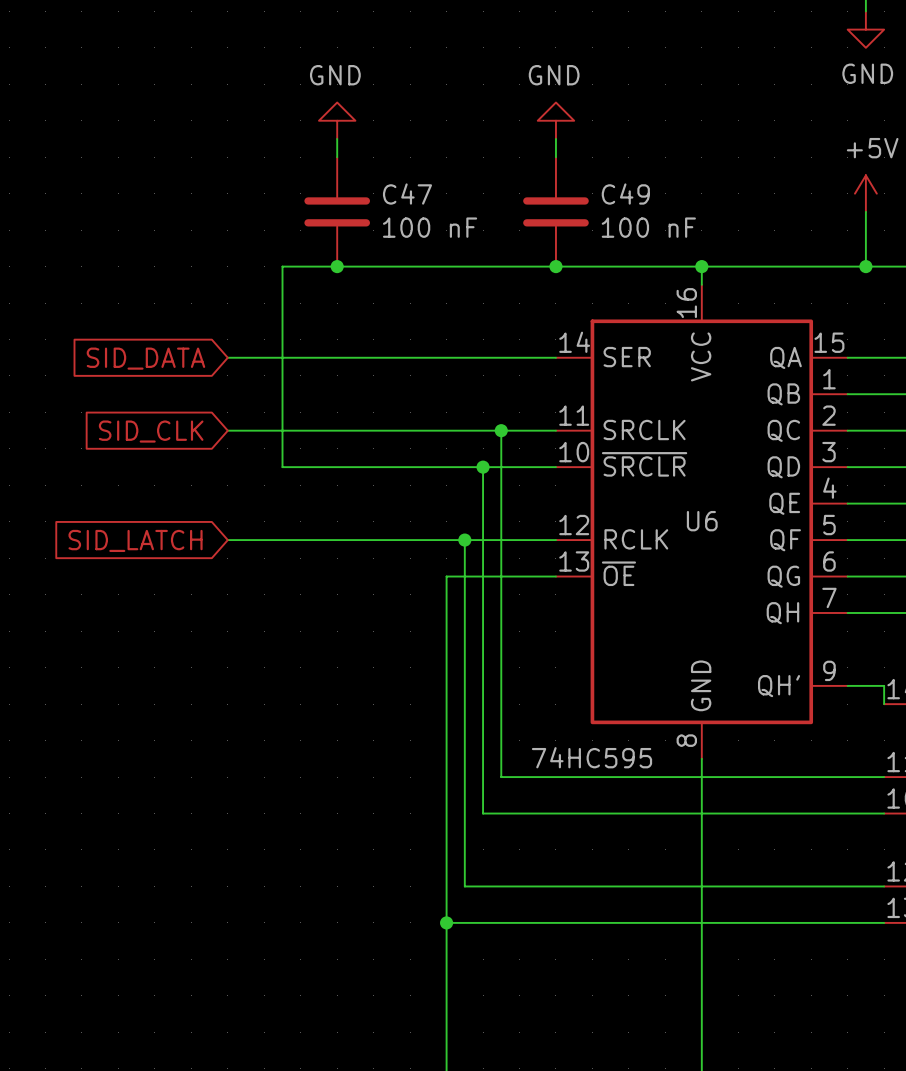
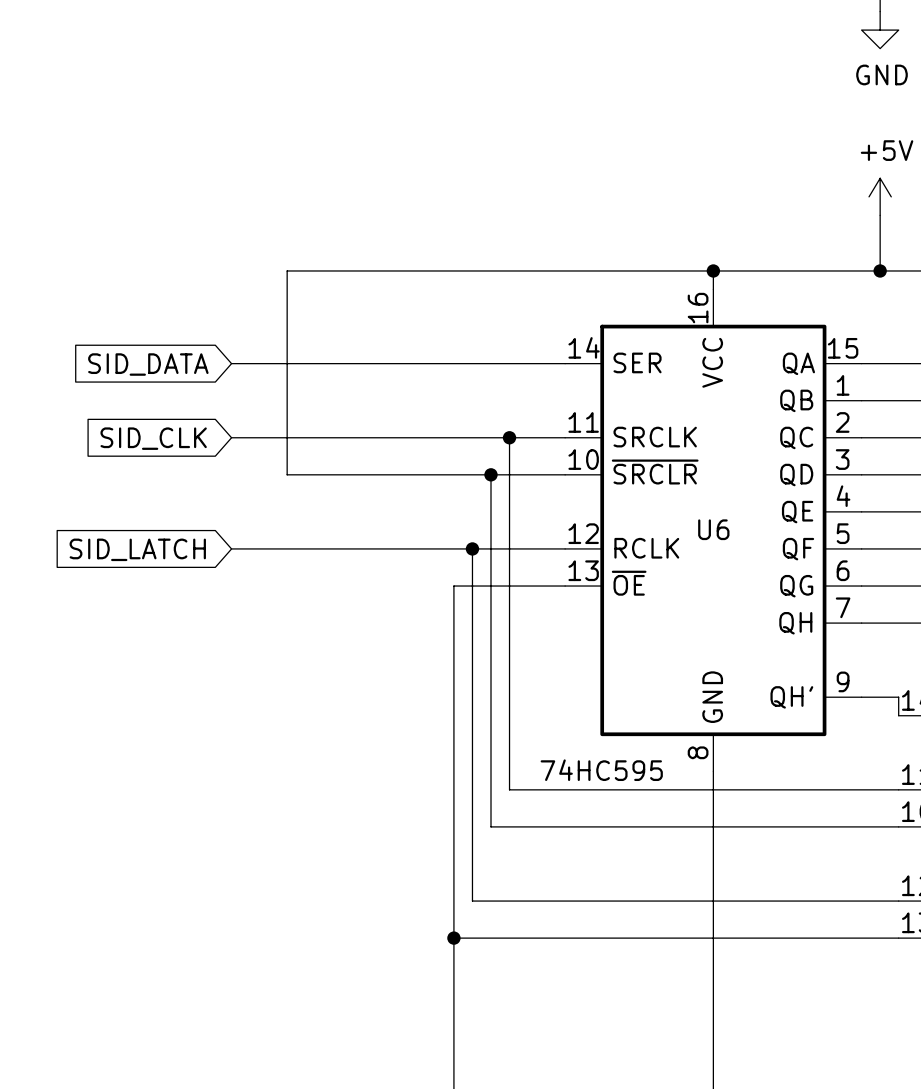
power symbol: GND (337, 120) -> none
power symbol: GND (555, 120) -> none
wire: (337, 138) (337, 157) -> none
wire: (555, 138) (555, 157) -> none
C47: 100 nF (337, 211) -> none
C49: 100 nF (555, 211) -> none
junction: (337, 266) -> none
junction: (555, 266) -> none

